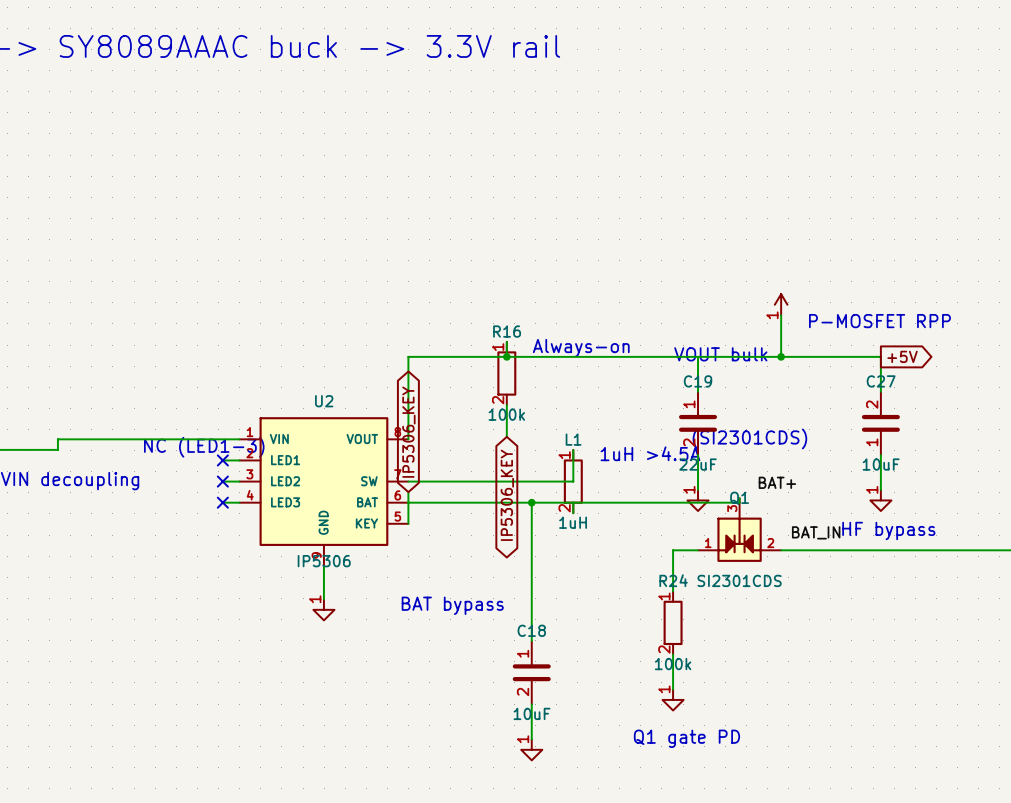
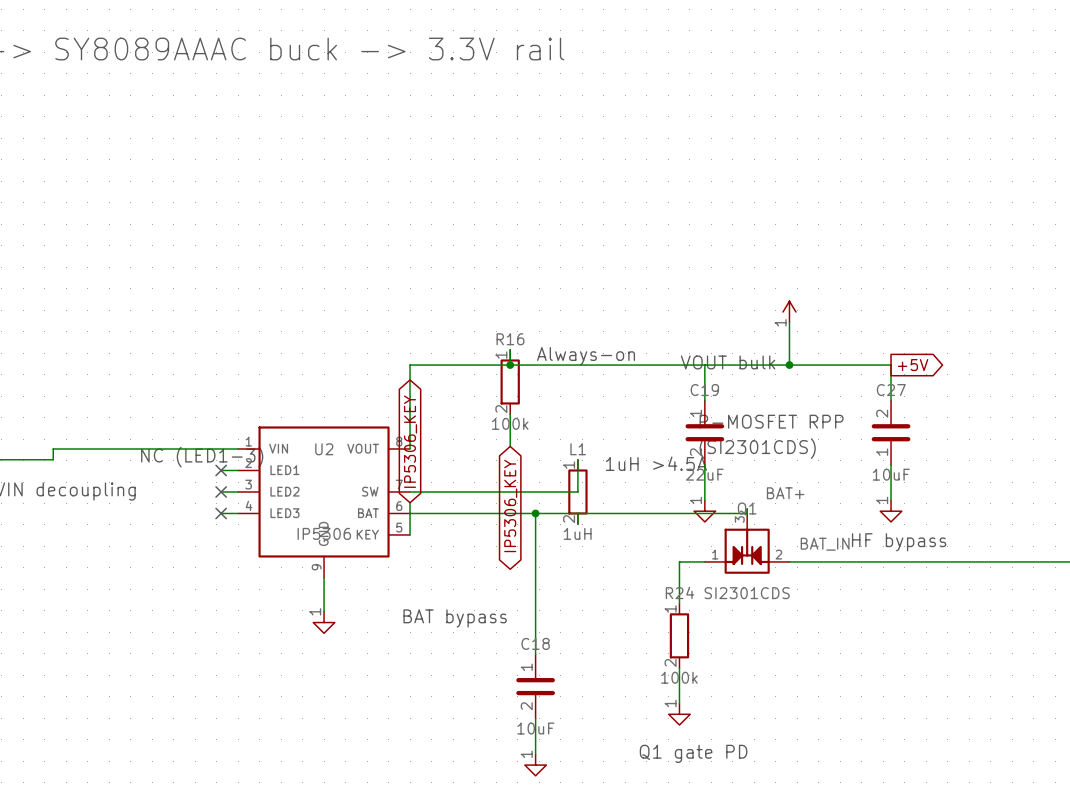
text position: P-MOSFET RPP (879, 321) -> P-MOSFET RPP (771, 421)
U2 name position: U2 (324, 401) -> U2 (324, 449)
U2 value position: IP5306 (324, 561) -> IP5306 (324, 533)

